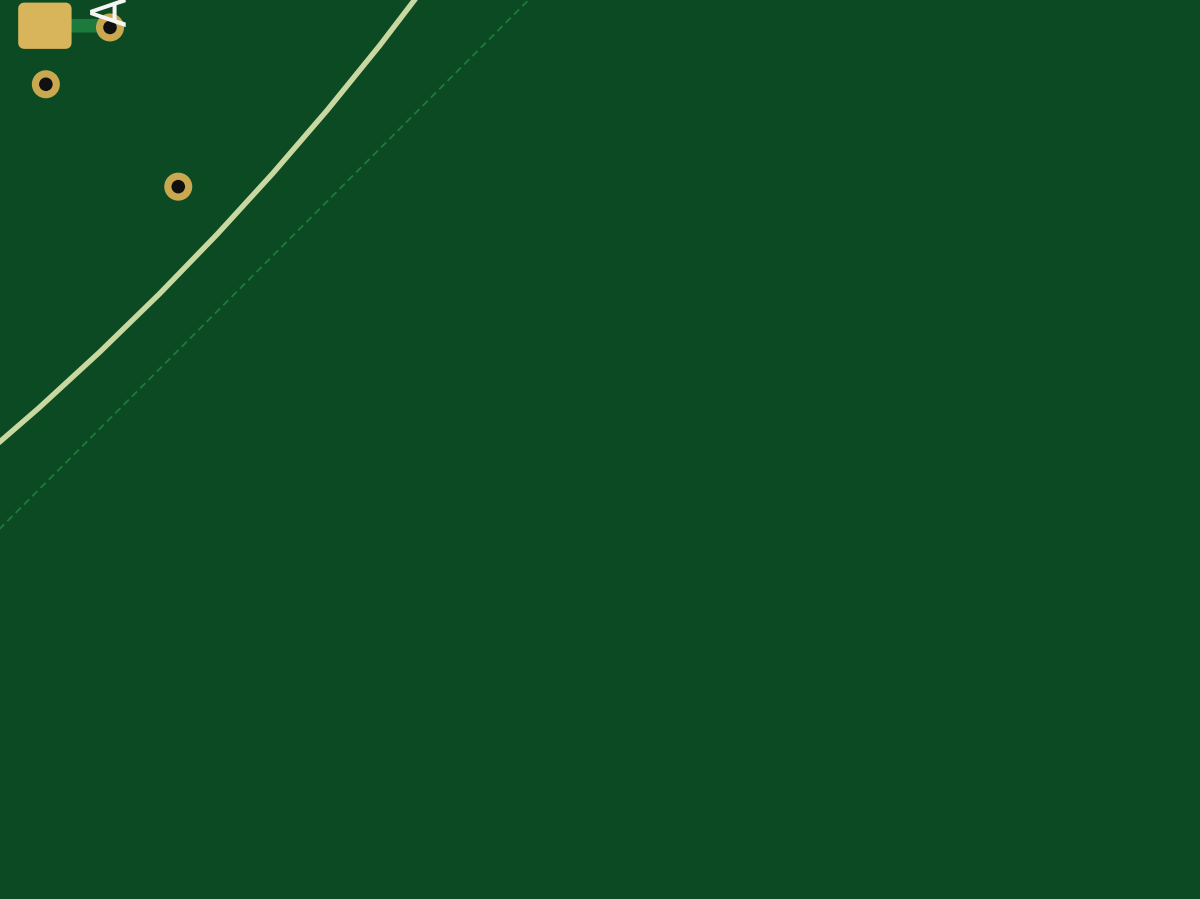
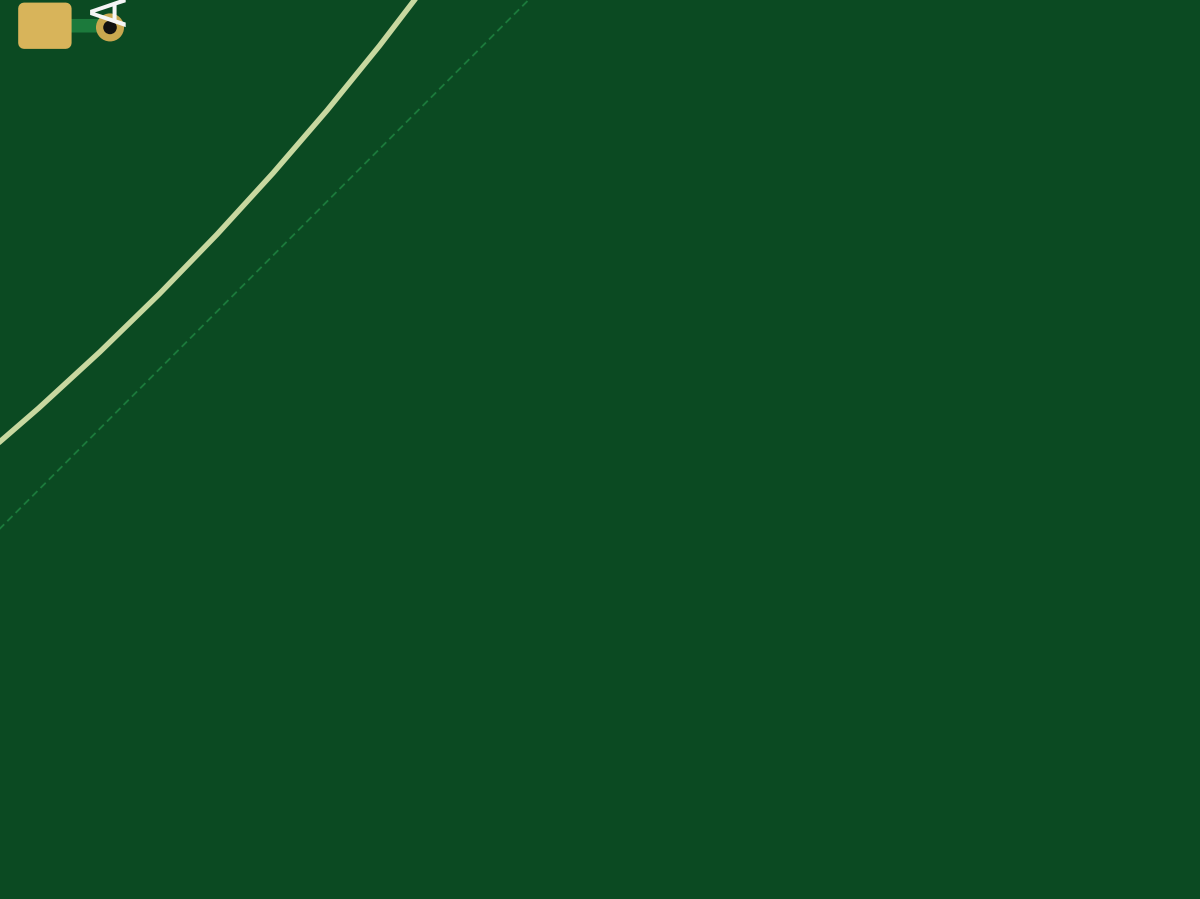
via: (45, 84) -> none
via: (178, 186) -> none

